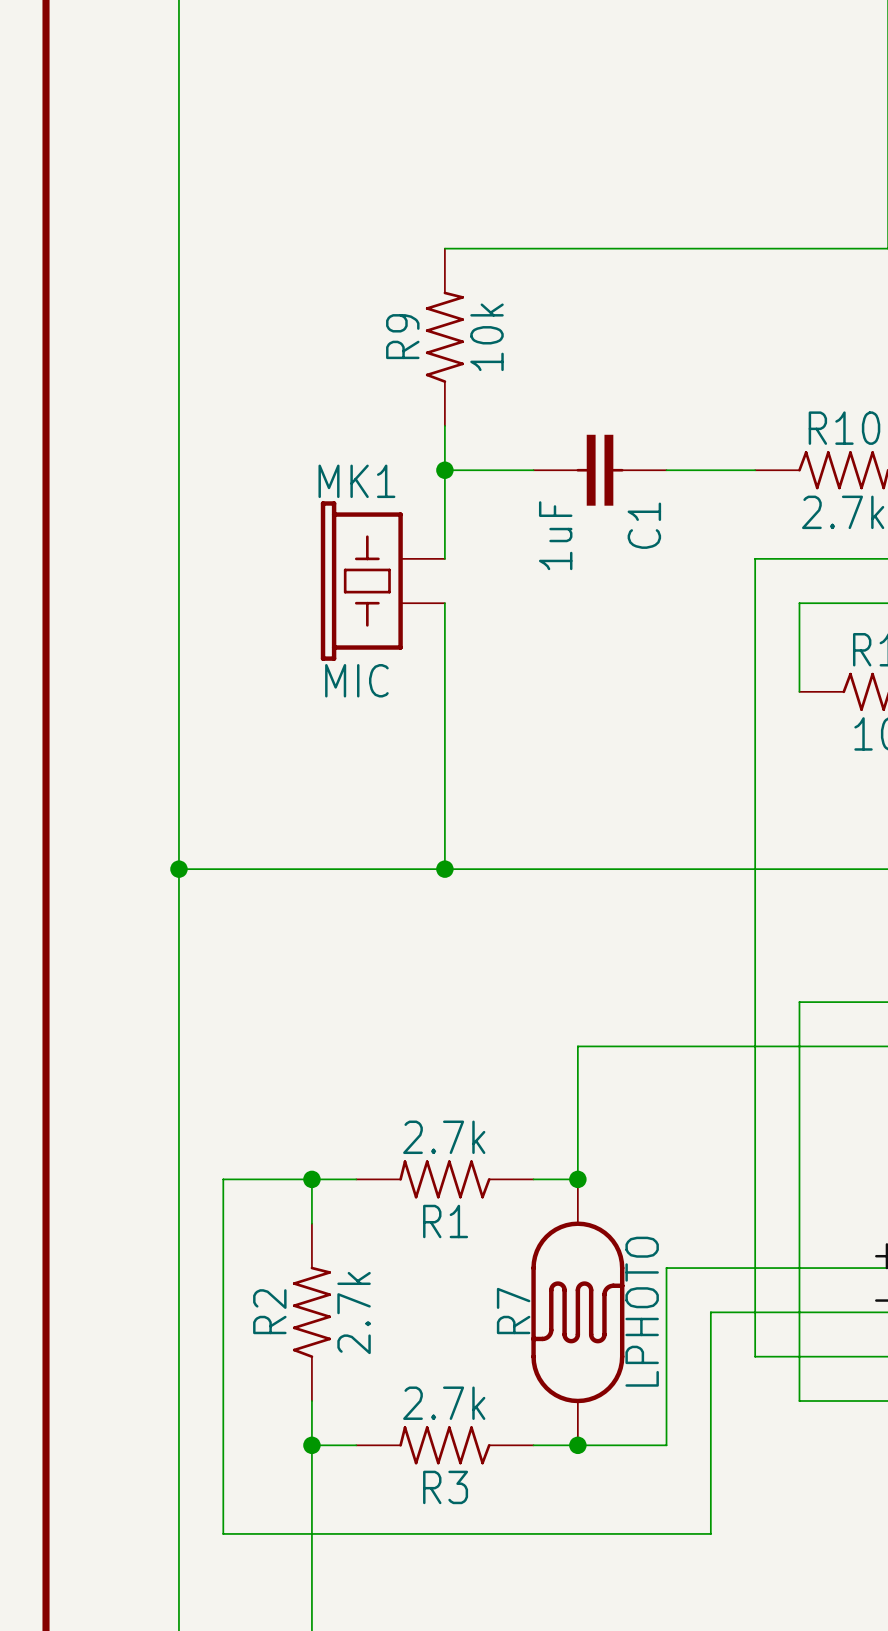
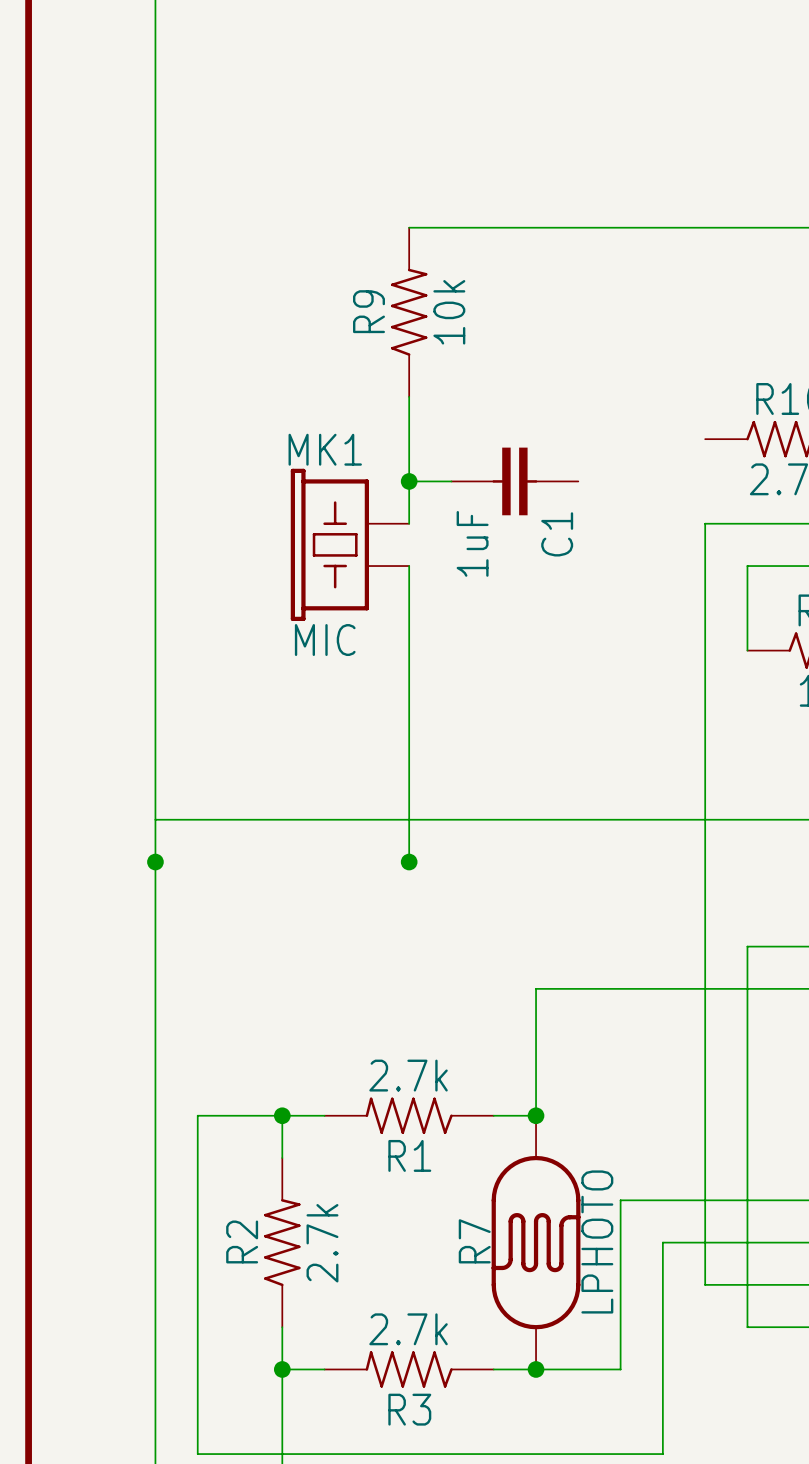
wire: (444, 470) (533, 470) -> none
junction position: (444, 470) -> (409, 481)
C1 position: (600, 470) -> (514, 481)
wire: (666, 470) (755, 470) -> none
wire: none -> (409, 481) (451, 481)
junction position: (178, 869) -> (155, 862)
wire: none -> (409, 819) (409, 862)
junction position: (444, 869) -> (409, 862)

